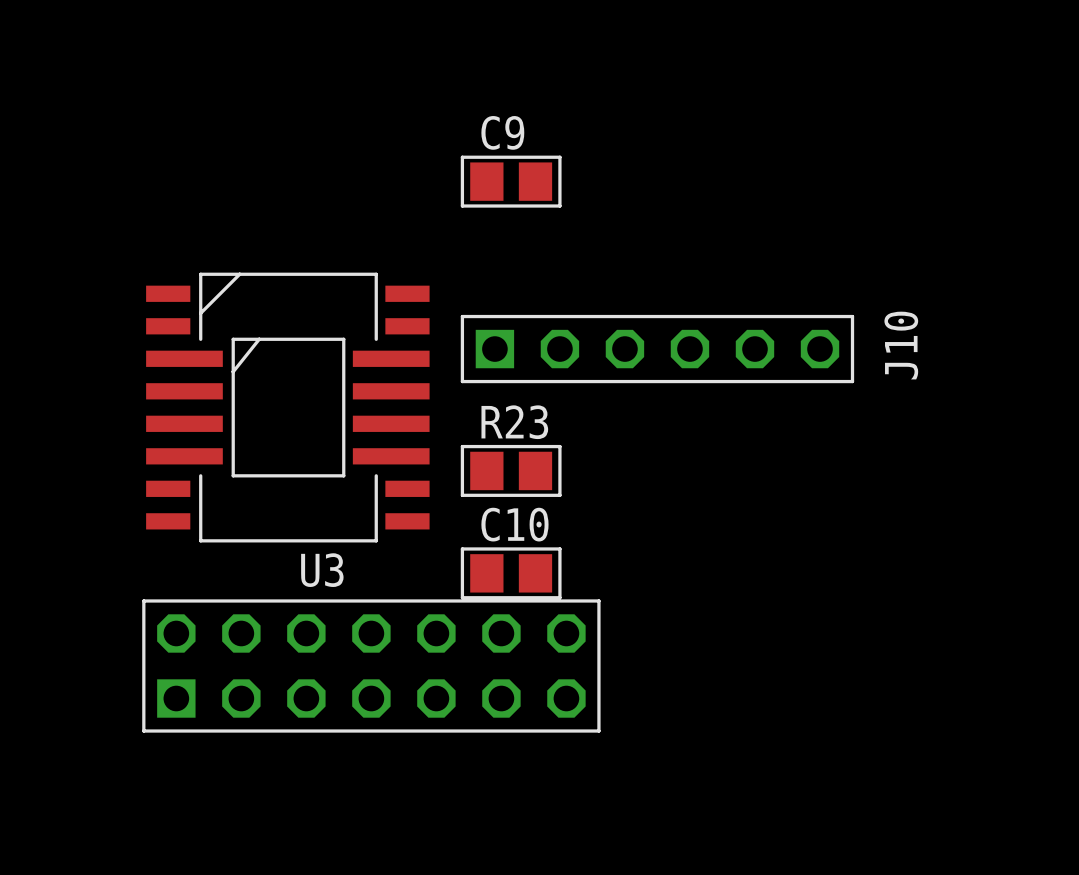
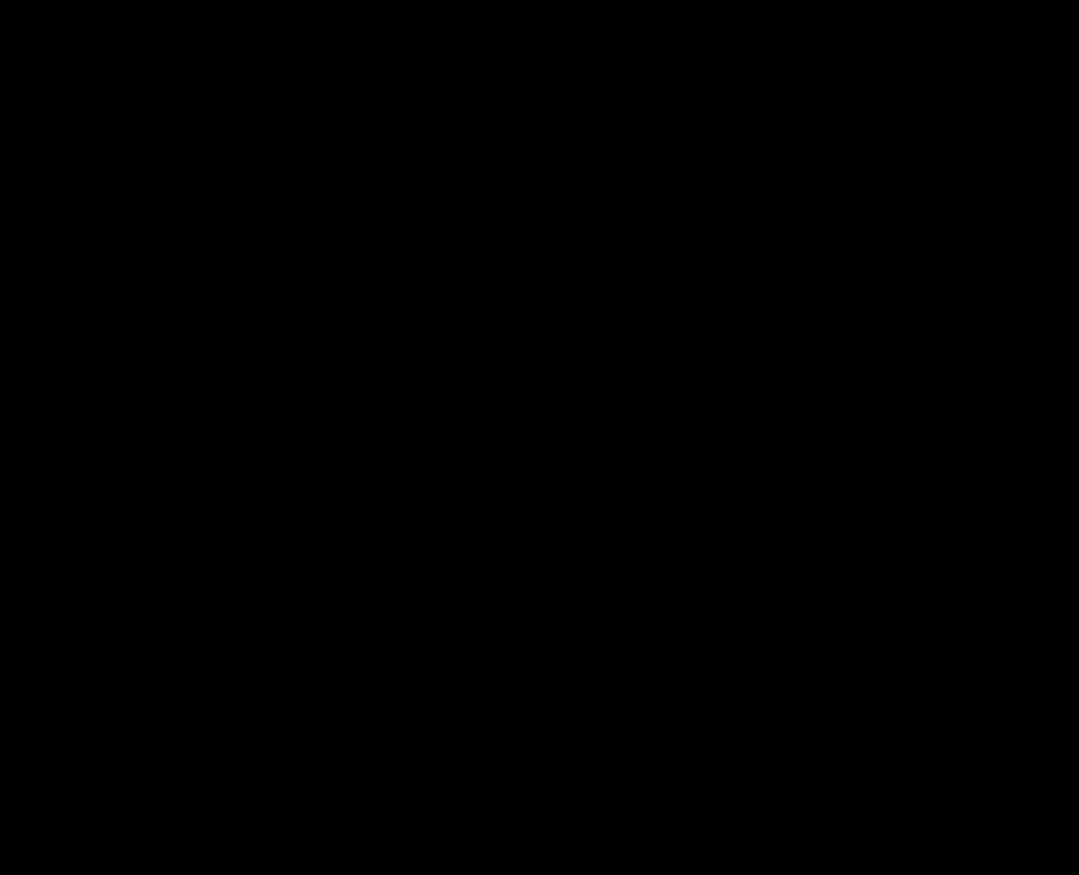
C9: (511, 181) -> none
J10: (657, 349) -> none
U3: (287, 407) -> none
R23: (511, 470) -> none
C10: (511, 573) -> none
part: (371, 666) -> none

